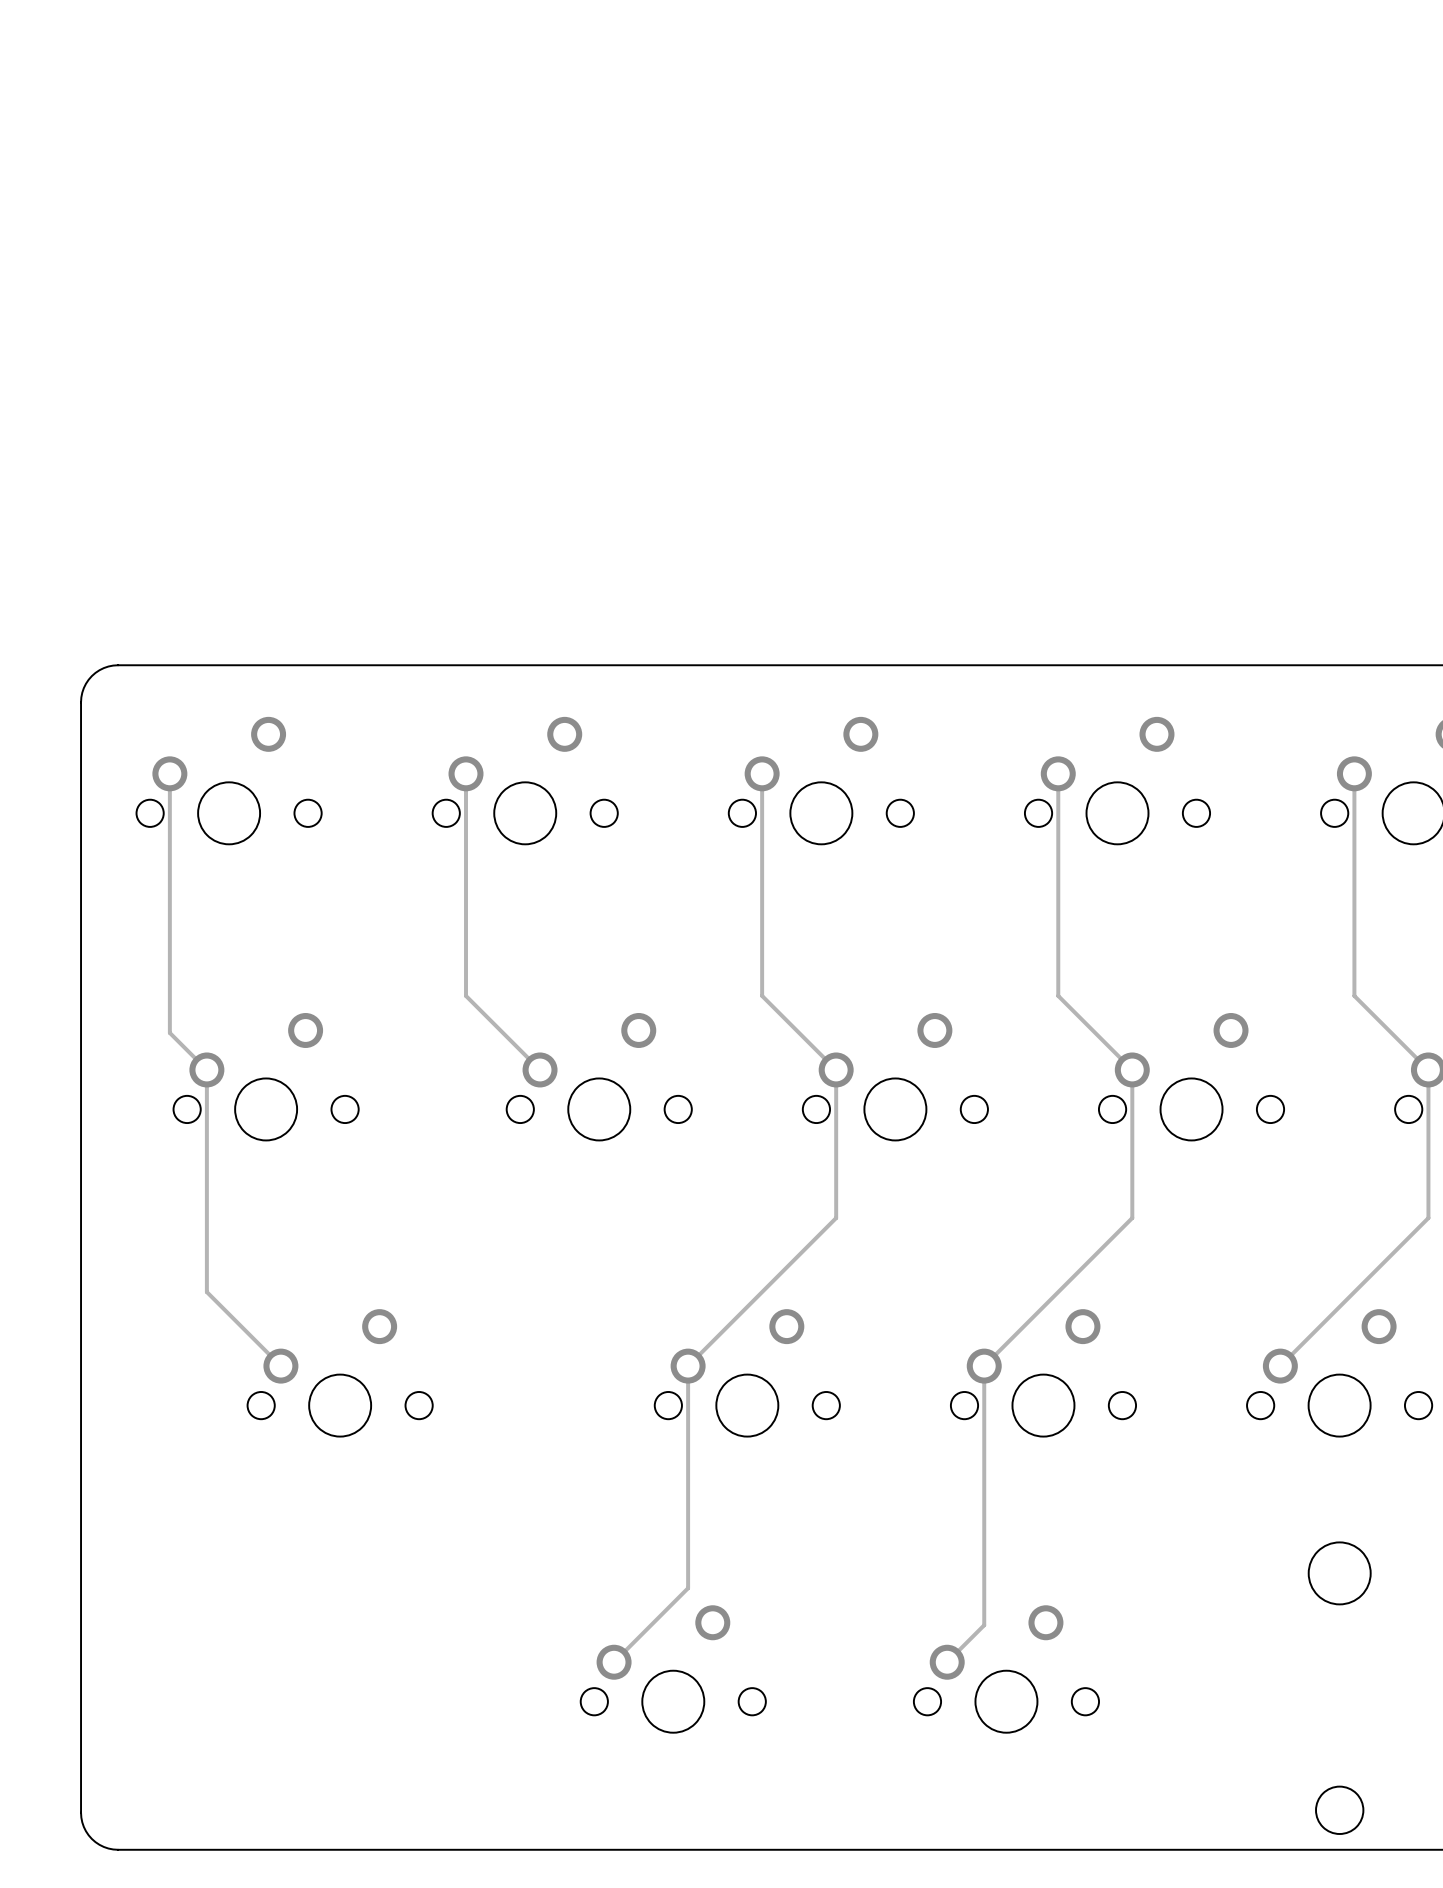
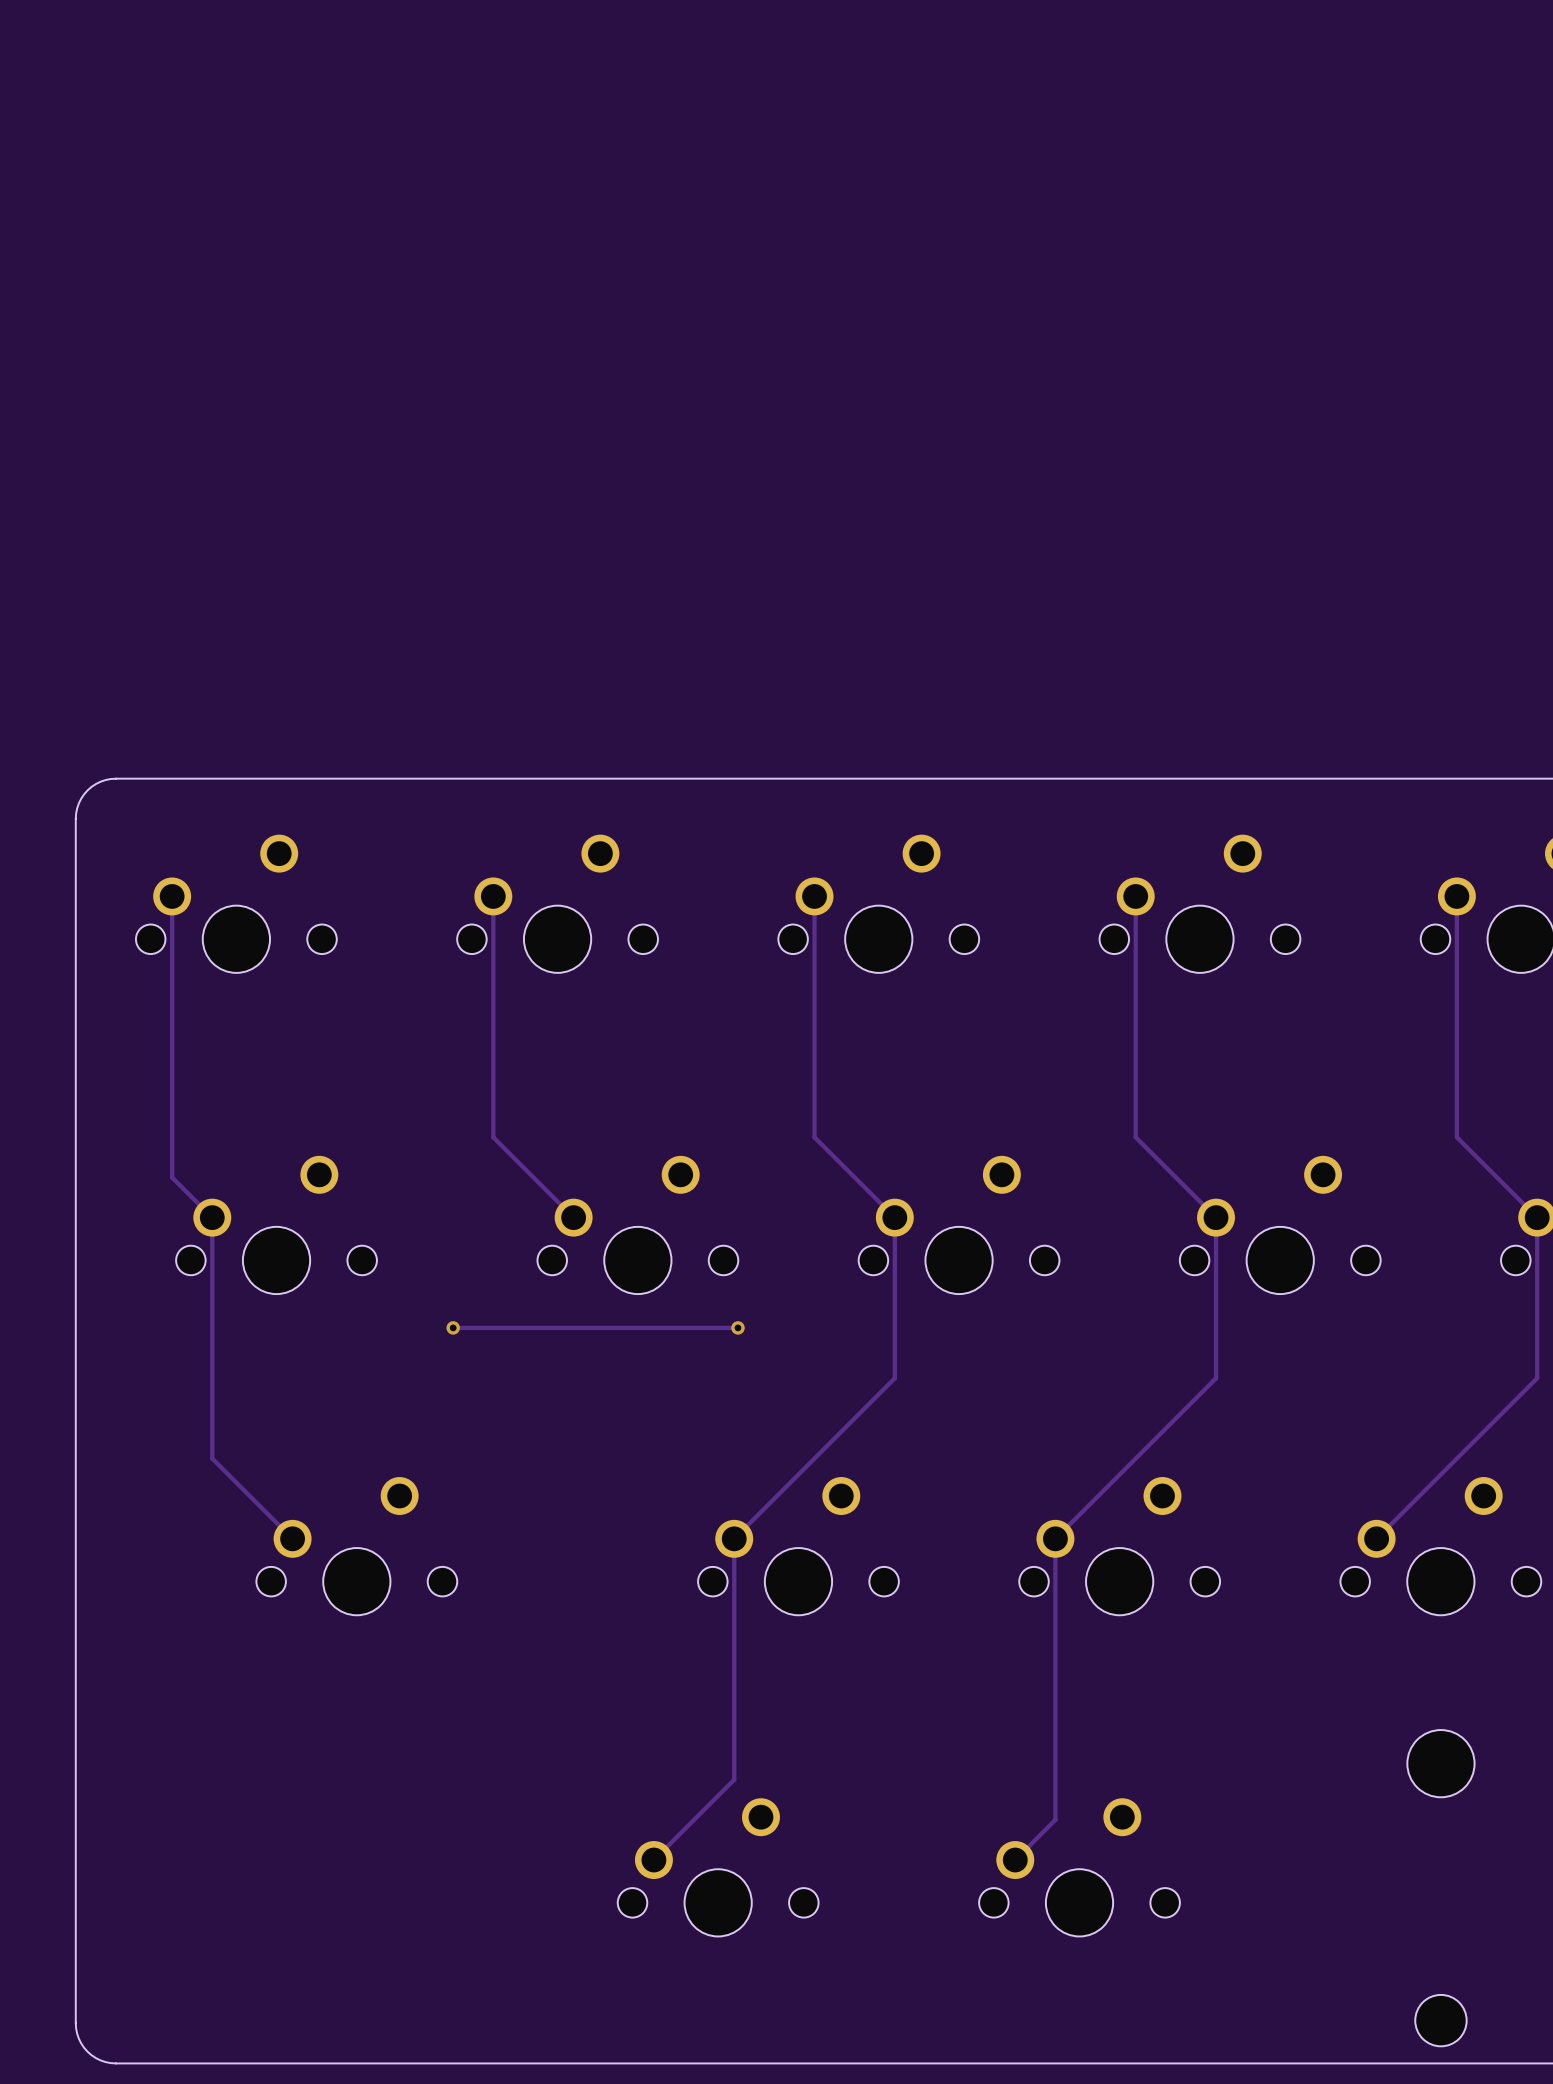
track: none -> (453, 1327) (737, 1327)
via: none -> (453, 1327)
via: none -> (737, 1327)

